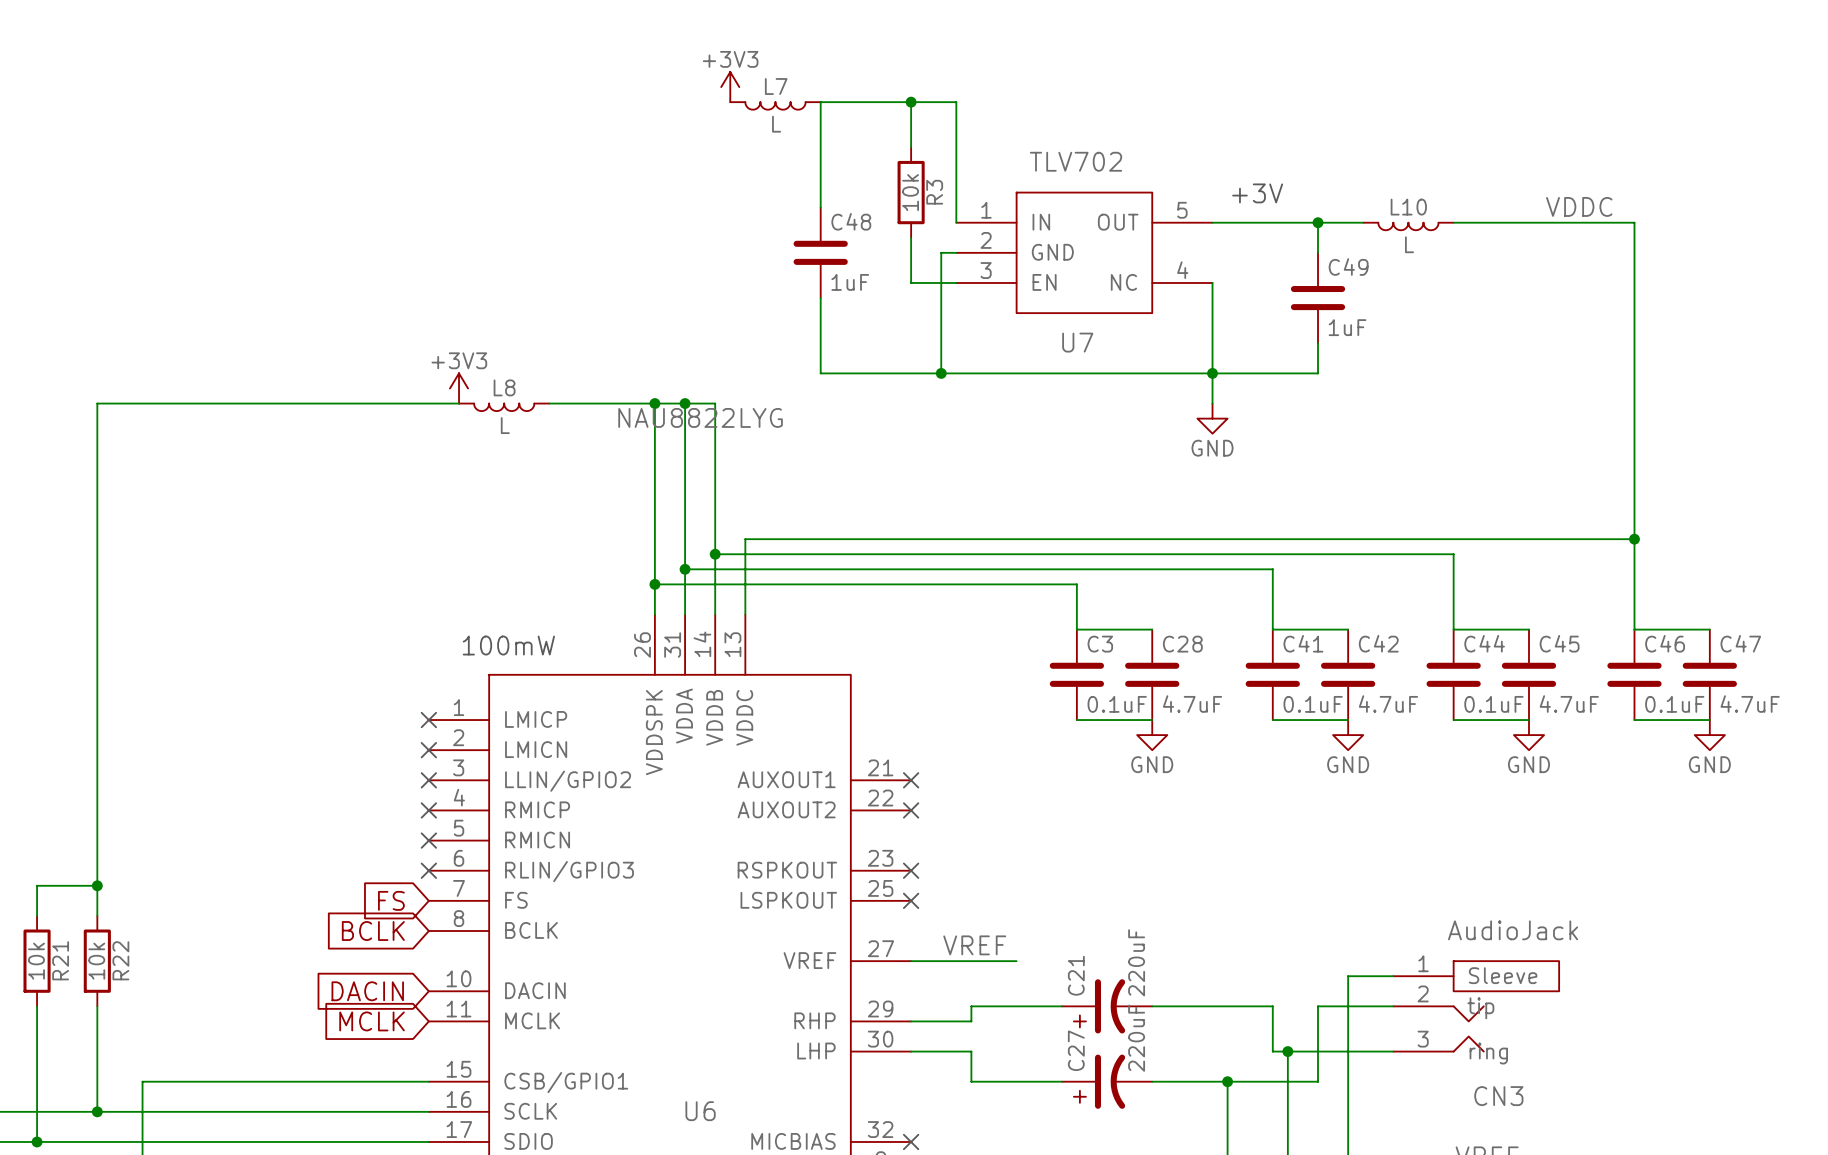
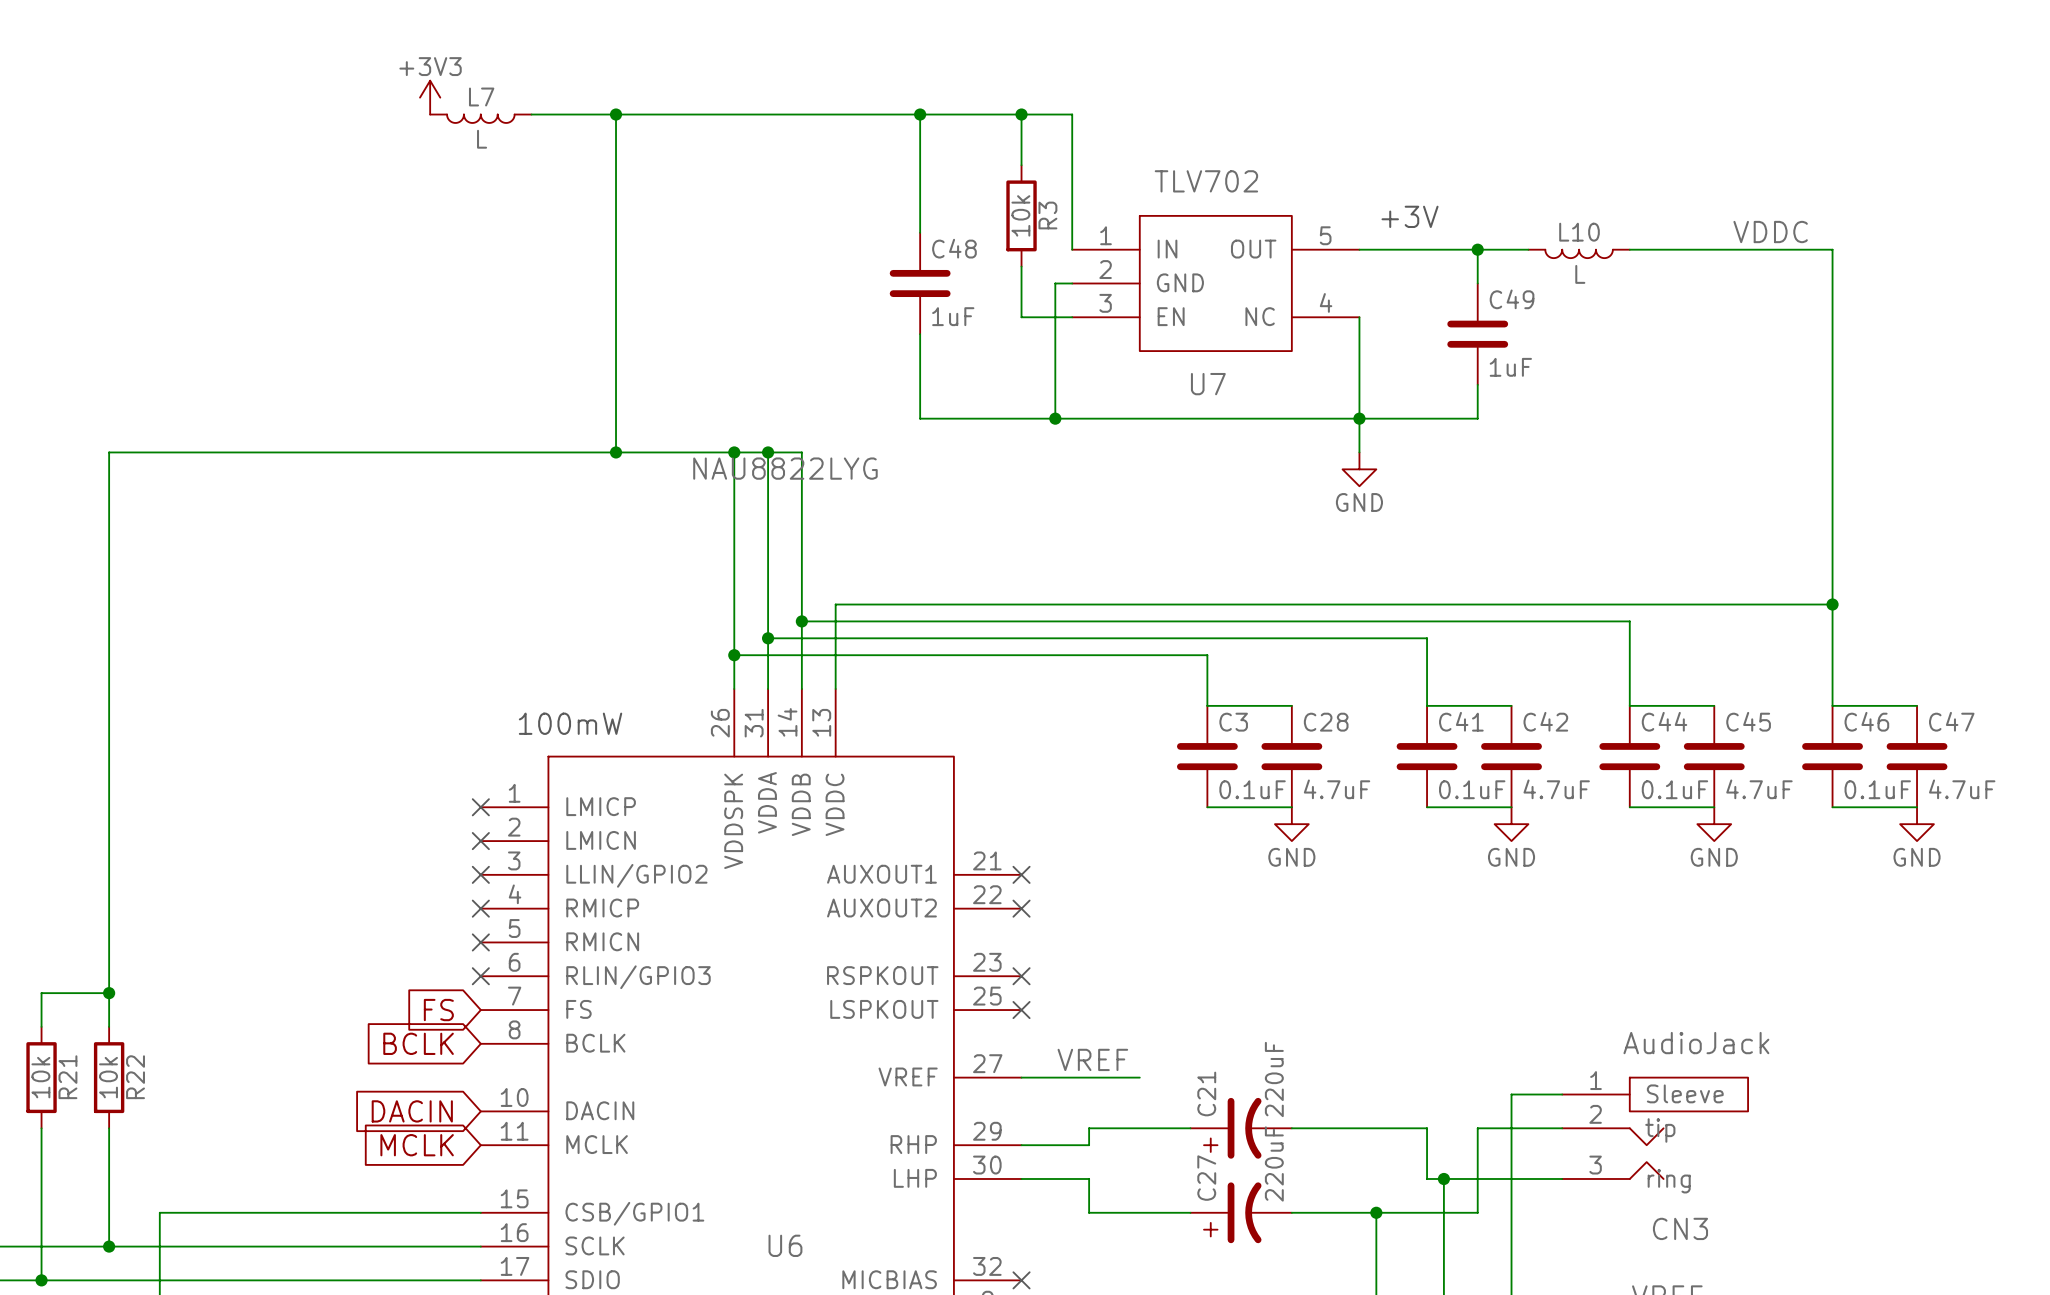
power symbol: none -> +3V3 (430, 97)
power symbol: +3V3 (730, 87) -> none
wire: none -> (531, 114) (920, 114)
wire: none -> (616, 114) (616, 452) (514, 452)
junction: none -> (616, 114)
junction: none -> (920, 114)
L7 position: (775, 105) -> (480, 118)
power symbol: +3V3 (459, 388) -> none
junction: none -> (616, 452)
L8: L (504, 407) -> none

